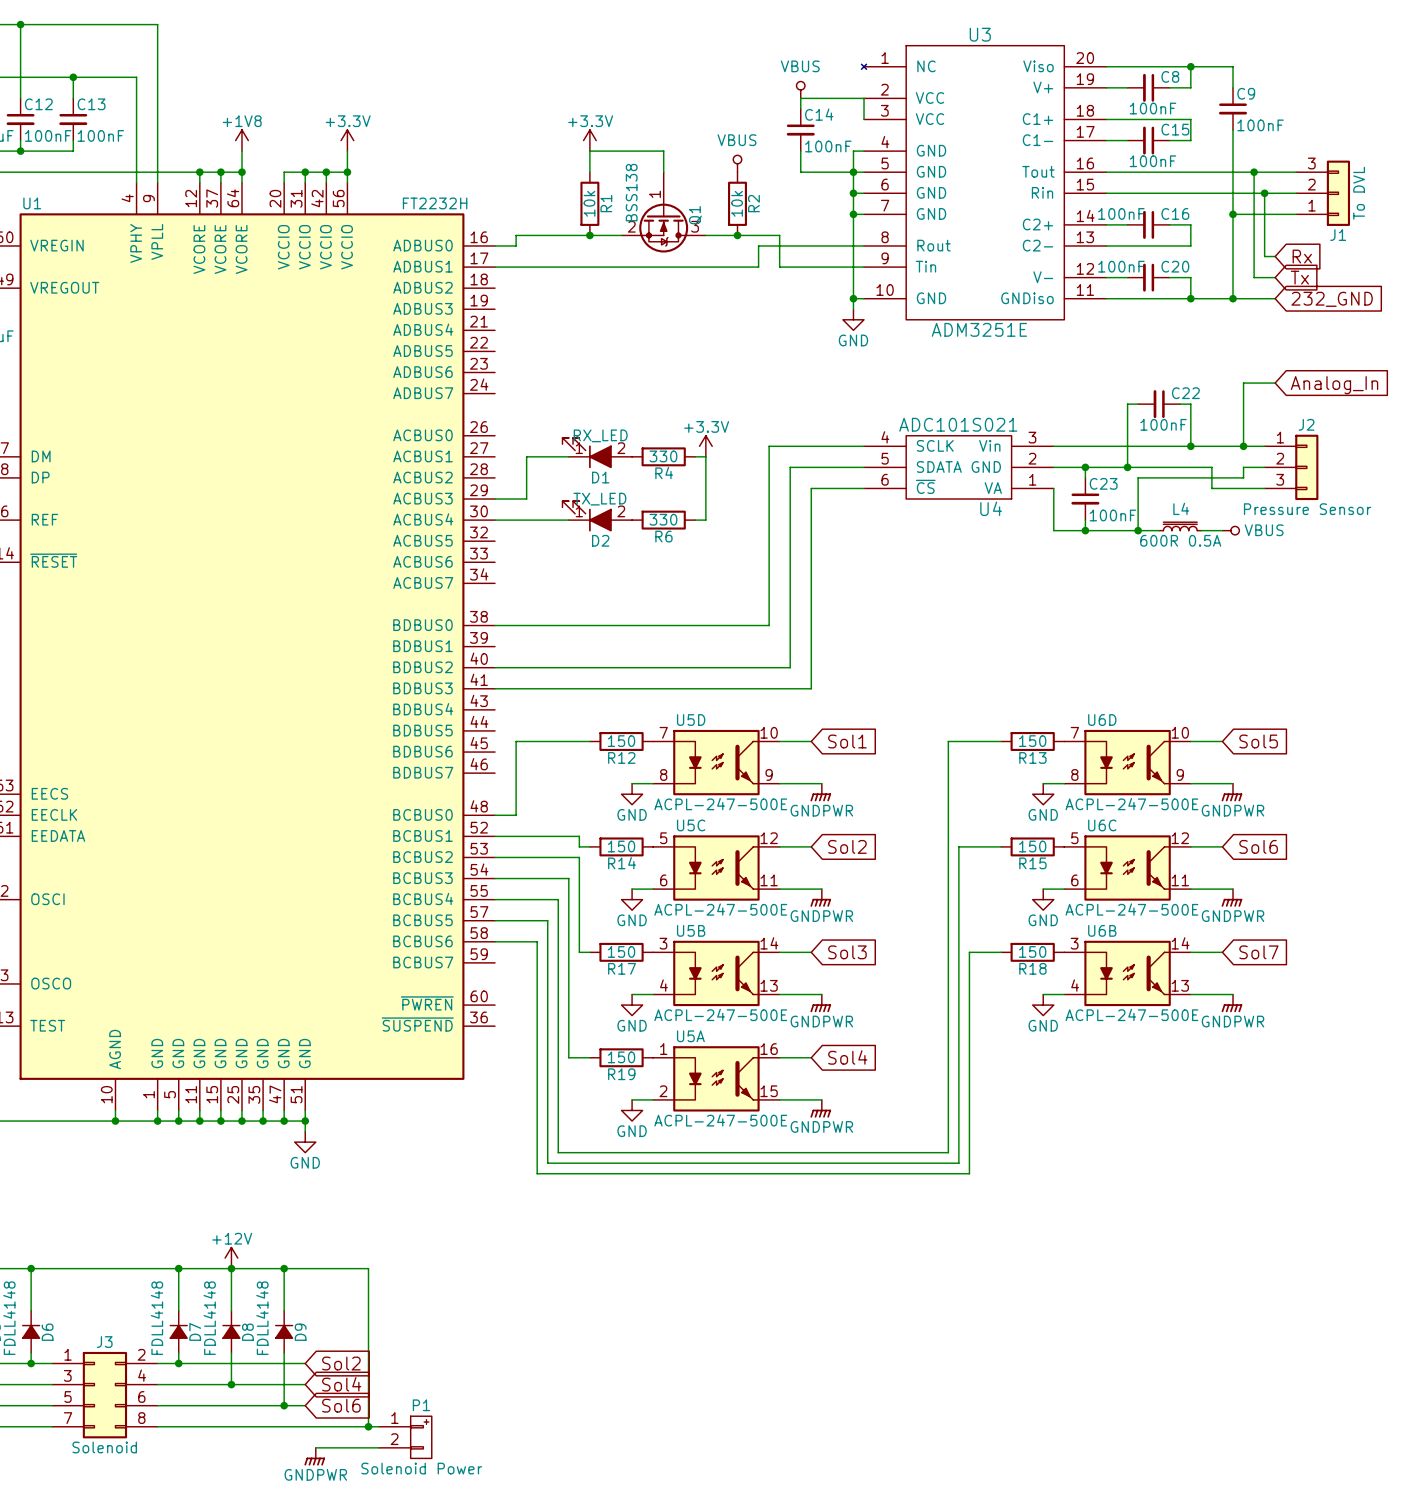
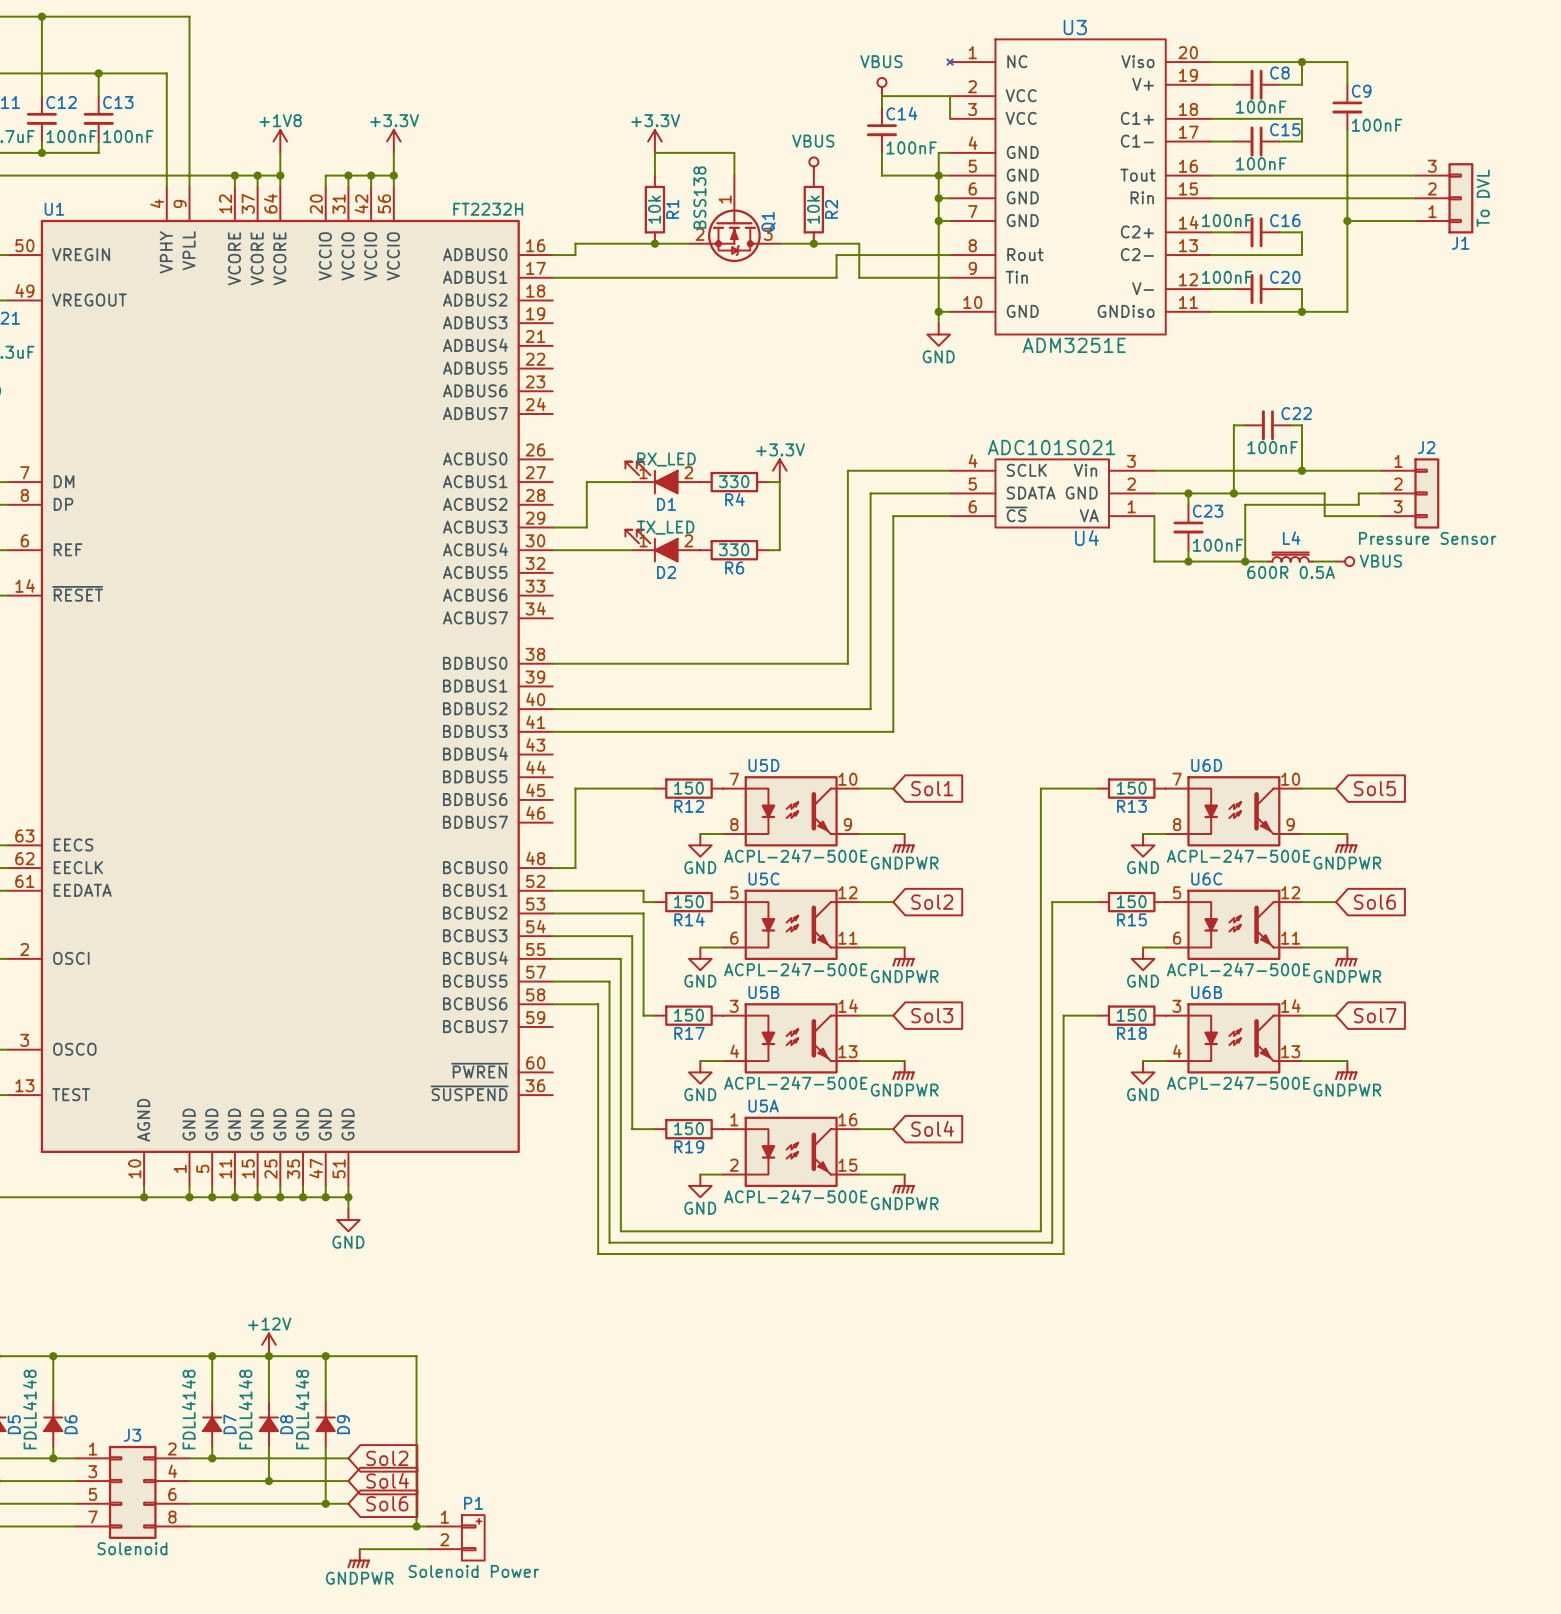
wire: (1254, 172) (1254, 277) (1275, 277) -> none
junction: (1254, 172) -> none
wire: (1264, 193) (1264, 256) (1275, 256) -> none
junction: (1264, 193) -> none
global label: Rx (1302, 256) -> none
global label: Tx (1299, 277) -> none
wire: (1233, 298) (1275, 298) -> none
junction: (1233, 298) -> none
global label: 232_GND (1332, 299) -> none
wire: (1275, 383) (1243, 383) (1243, 446) -> none
global label: Analog_In (1334, 385) -> none
junction: (1243, 446) -> none

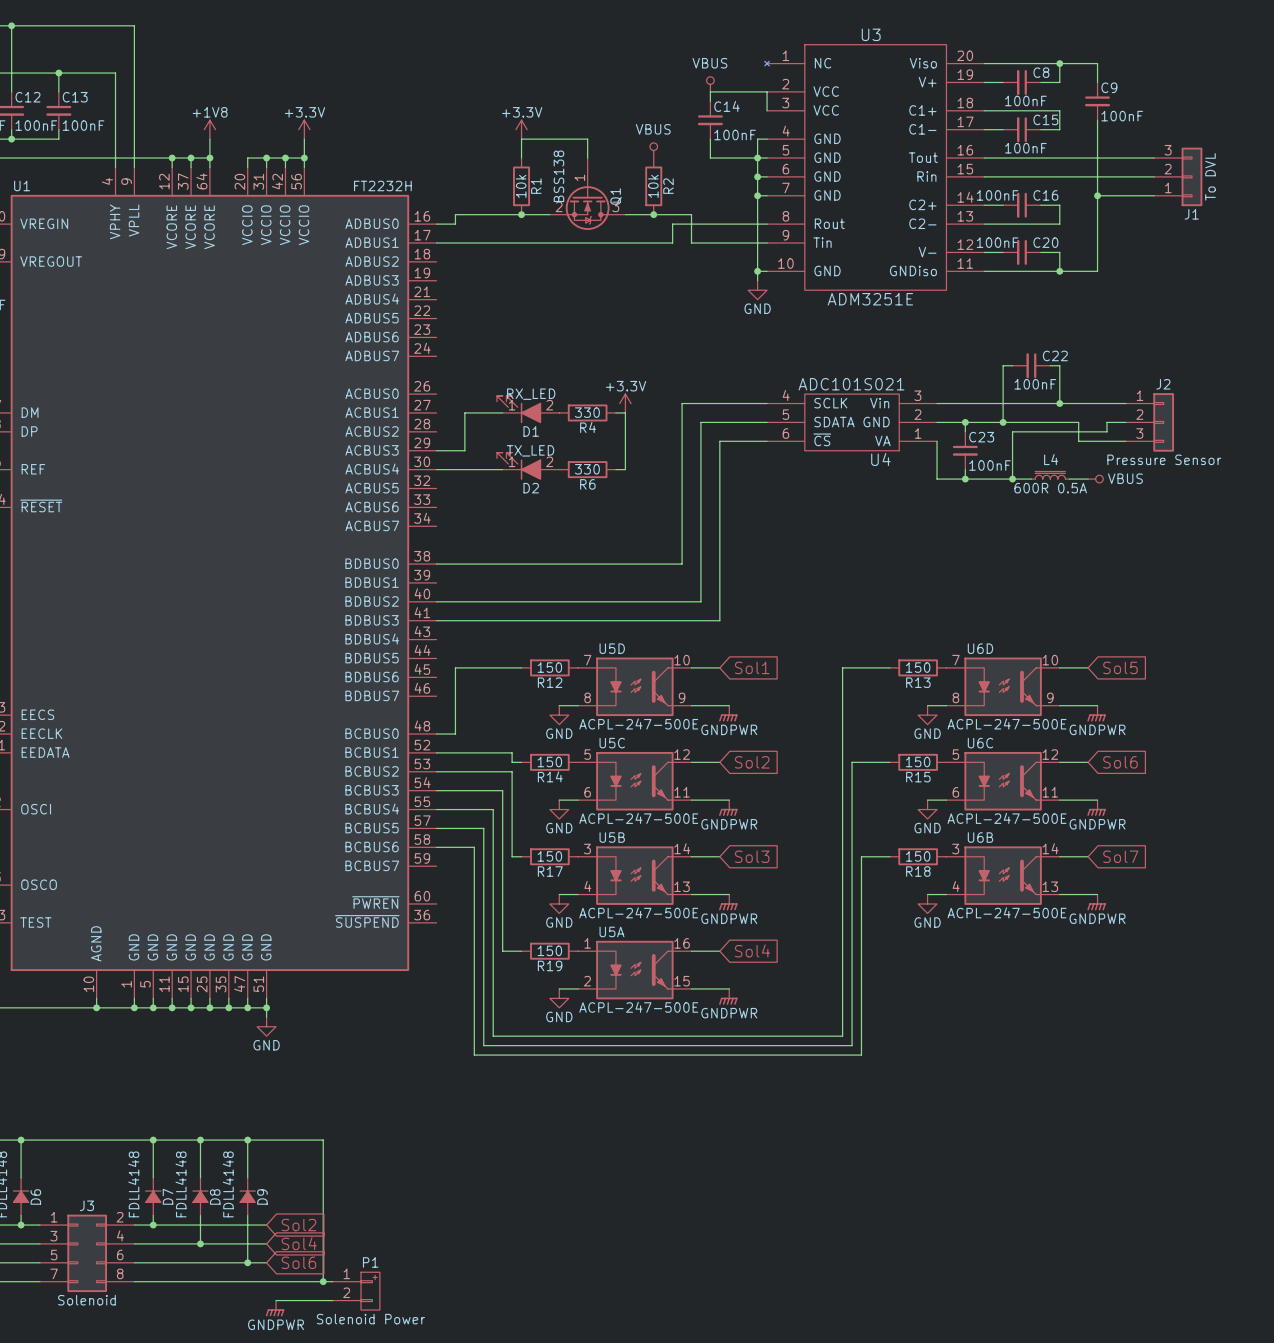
power symbol: +12V (268, 1344) -> none

